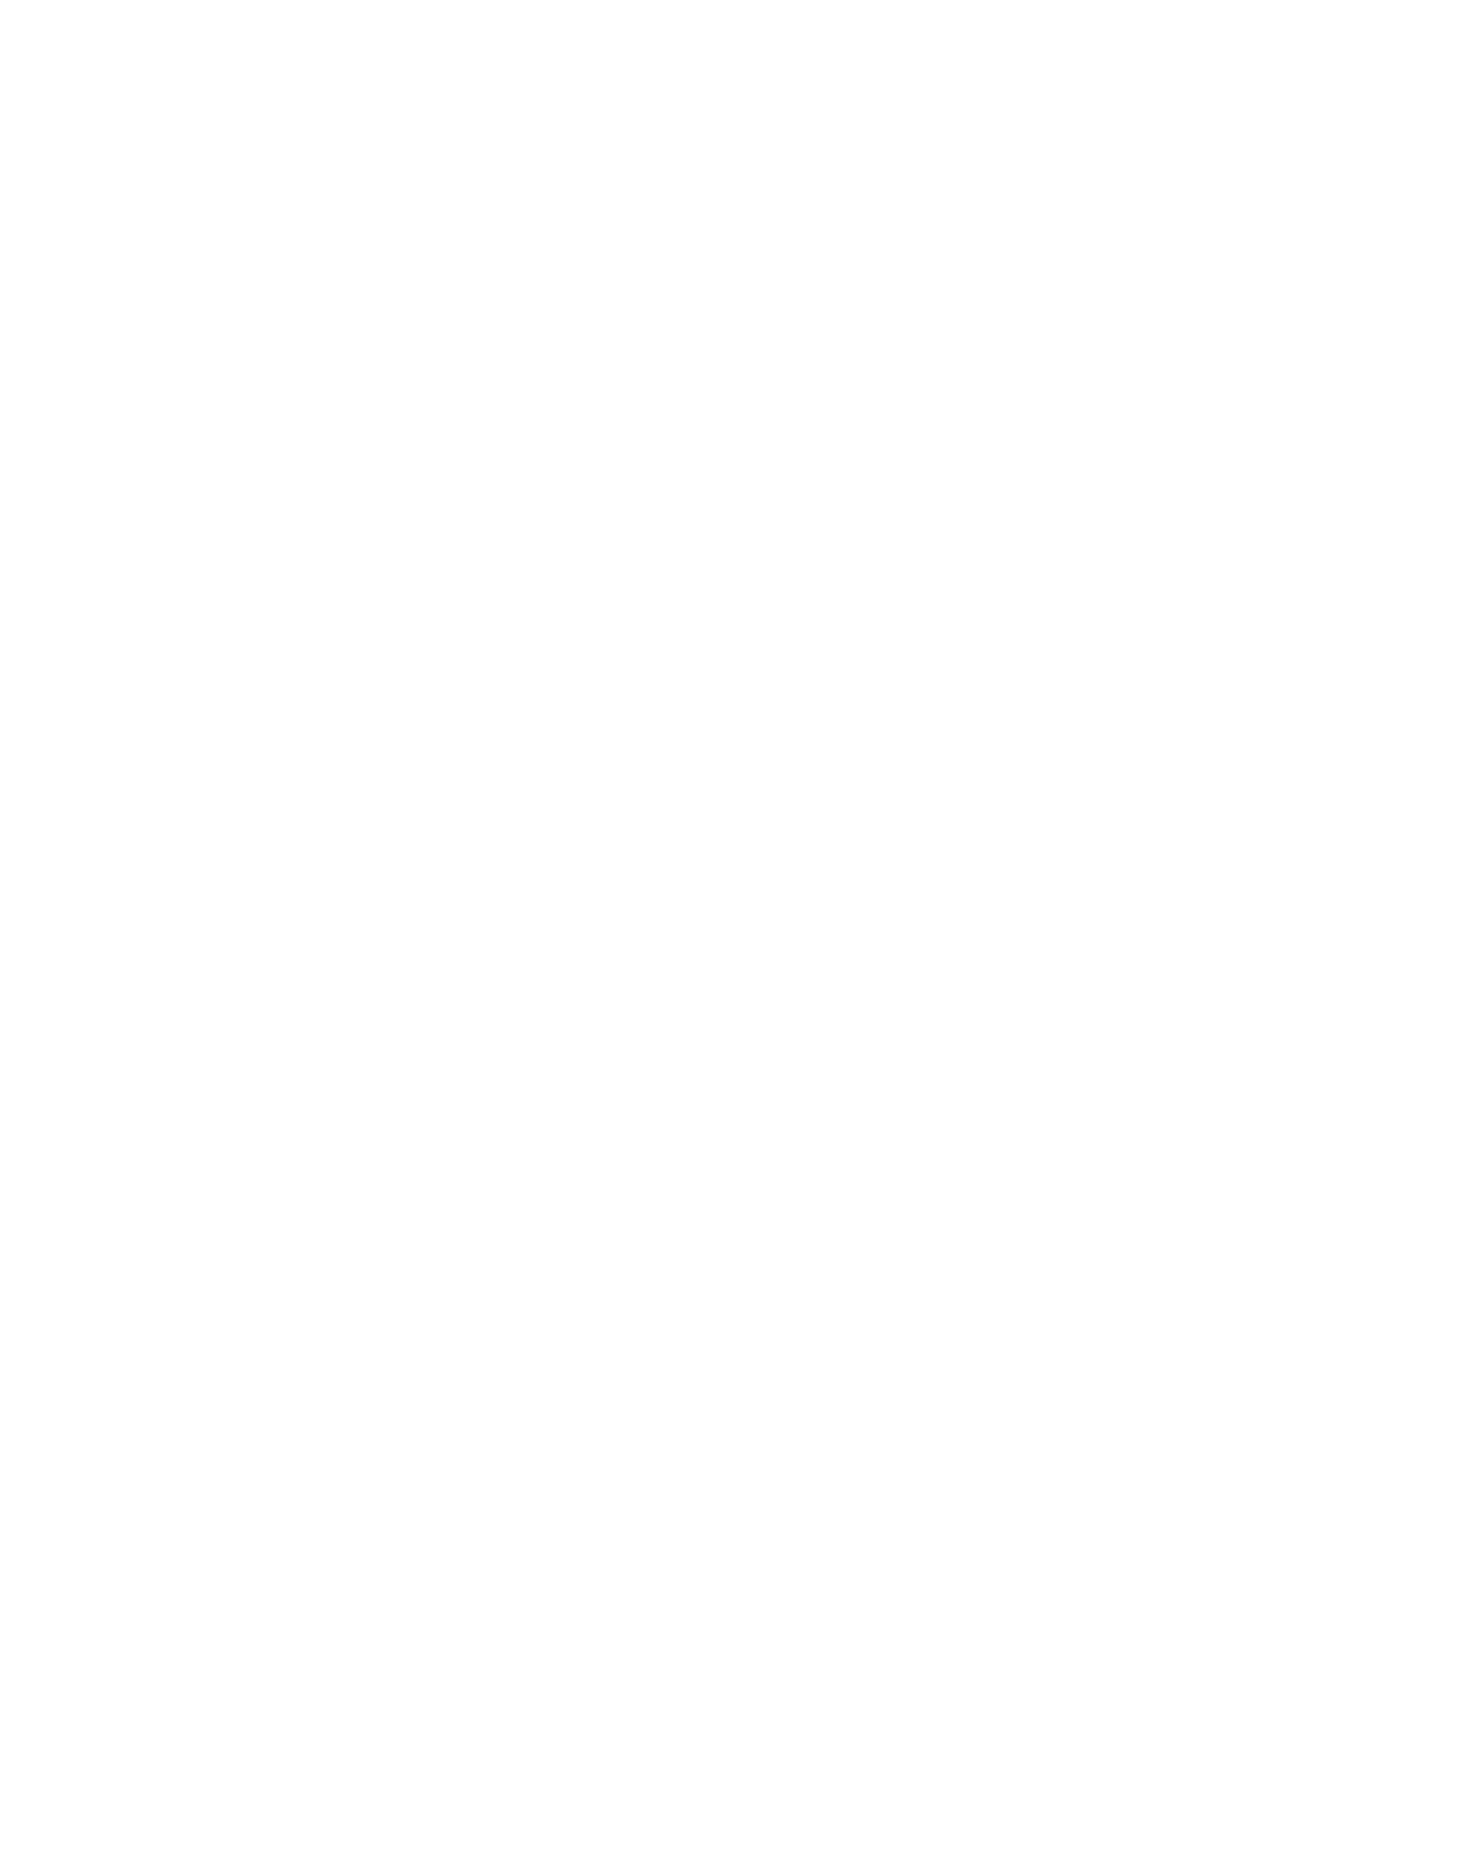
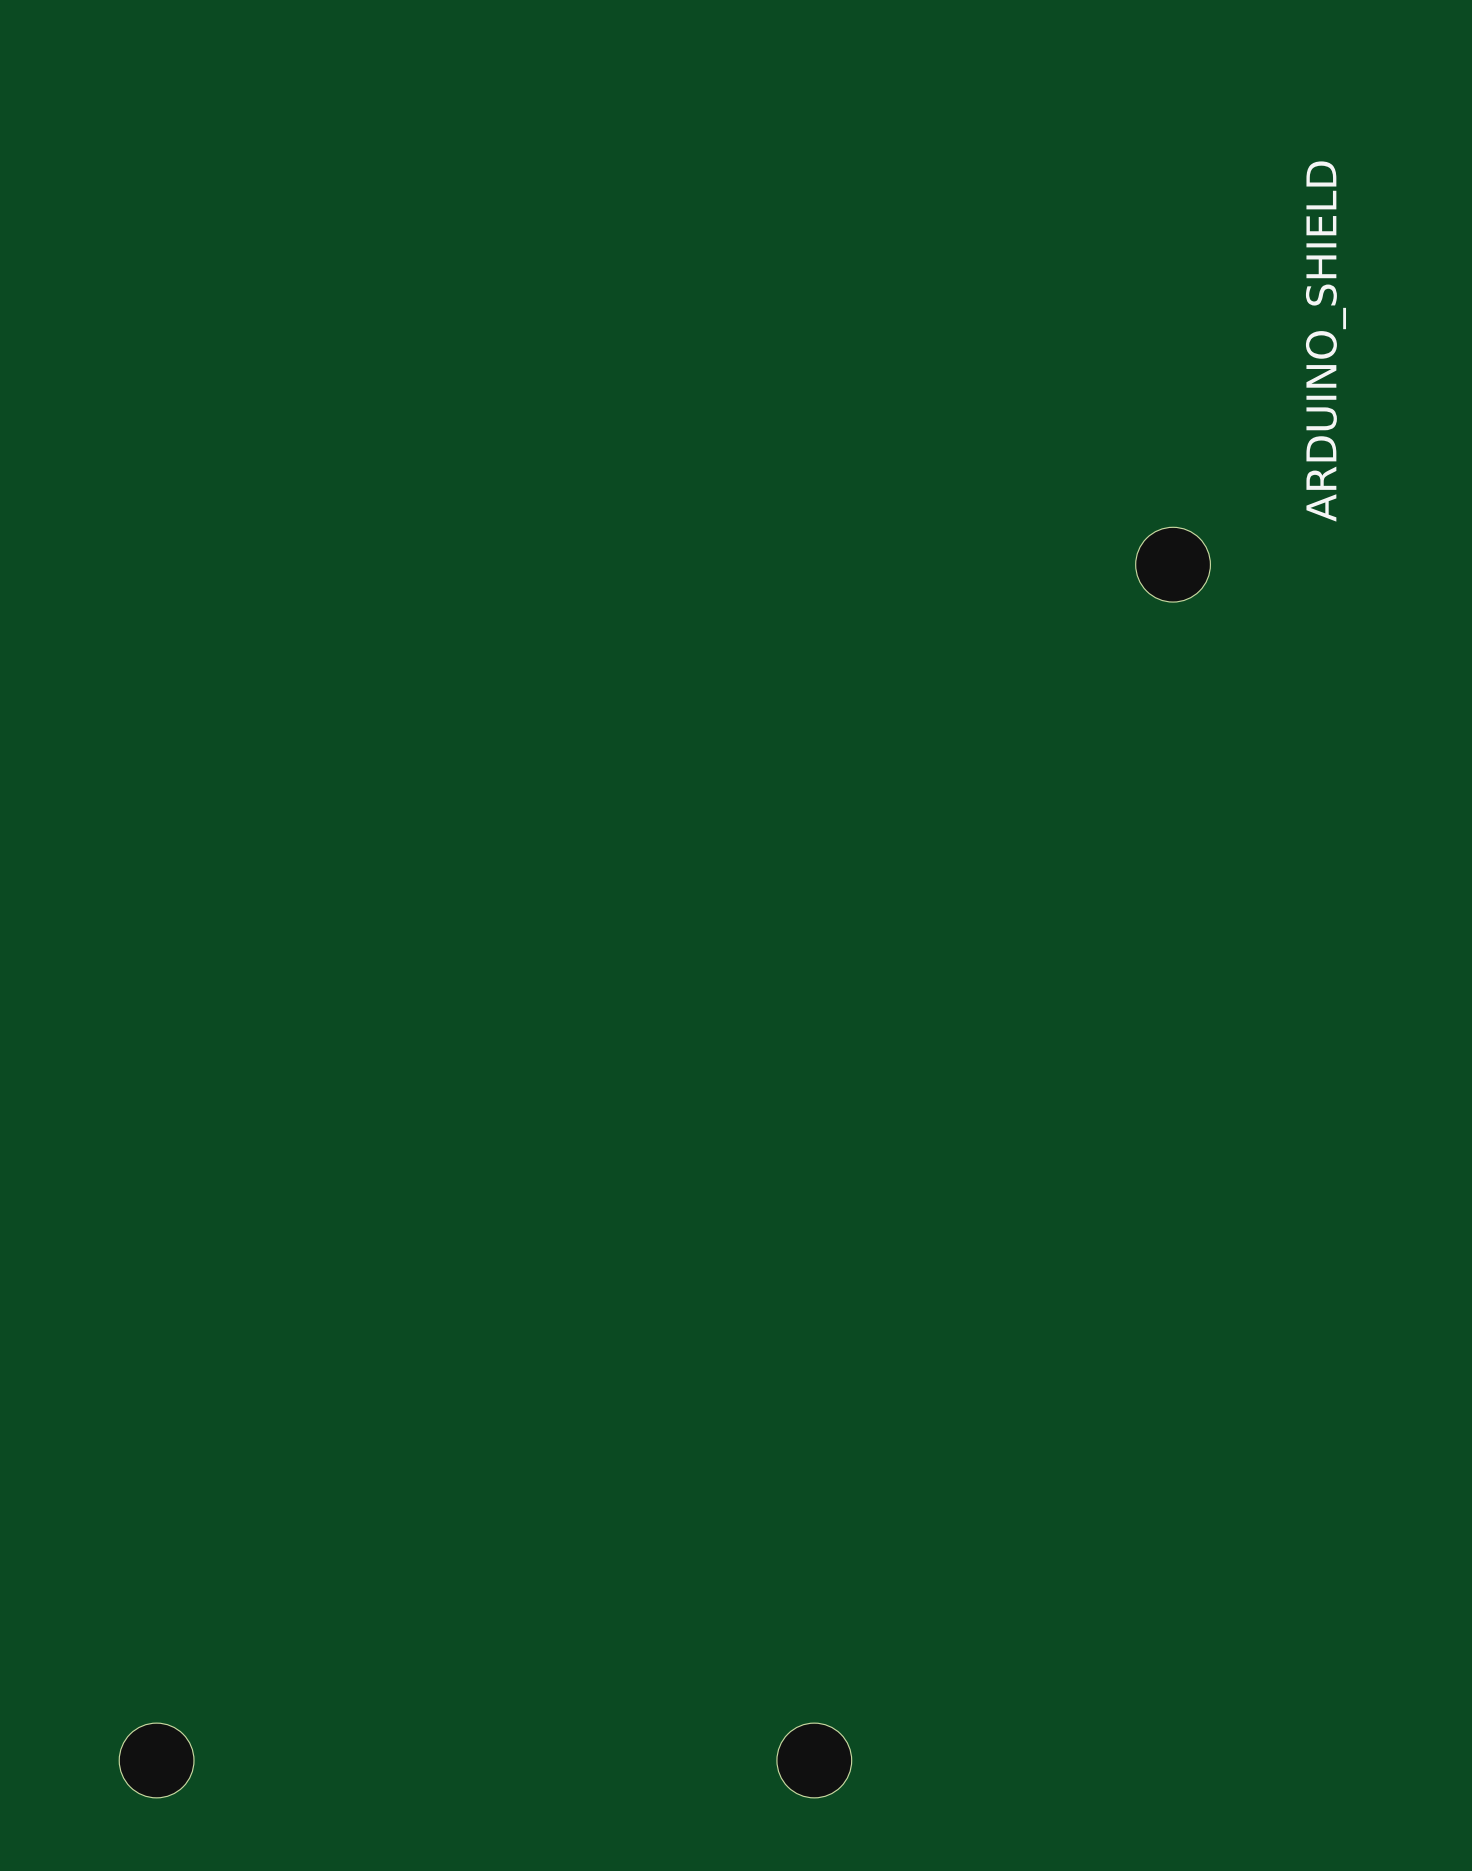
ARDUINO_SHIELD: none -> (664, 1162)

